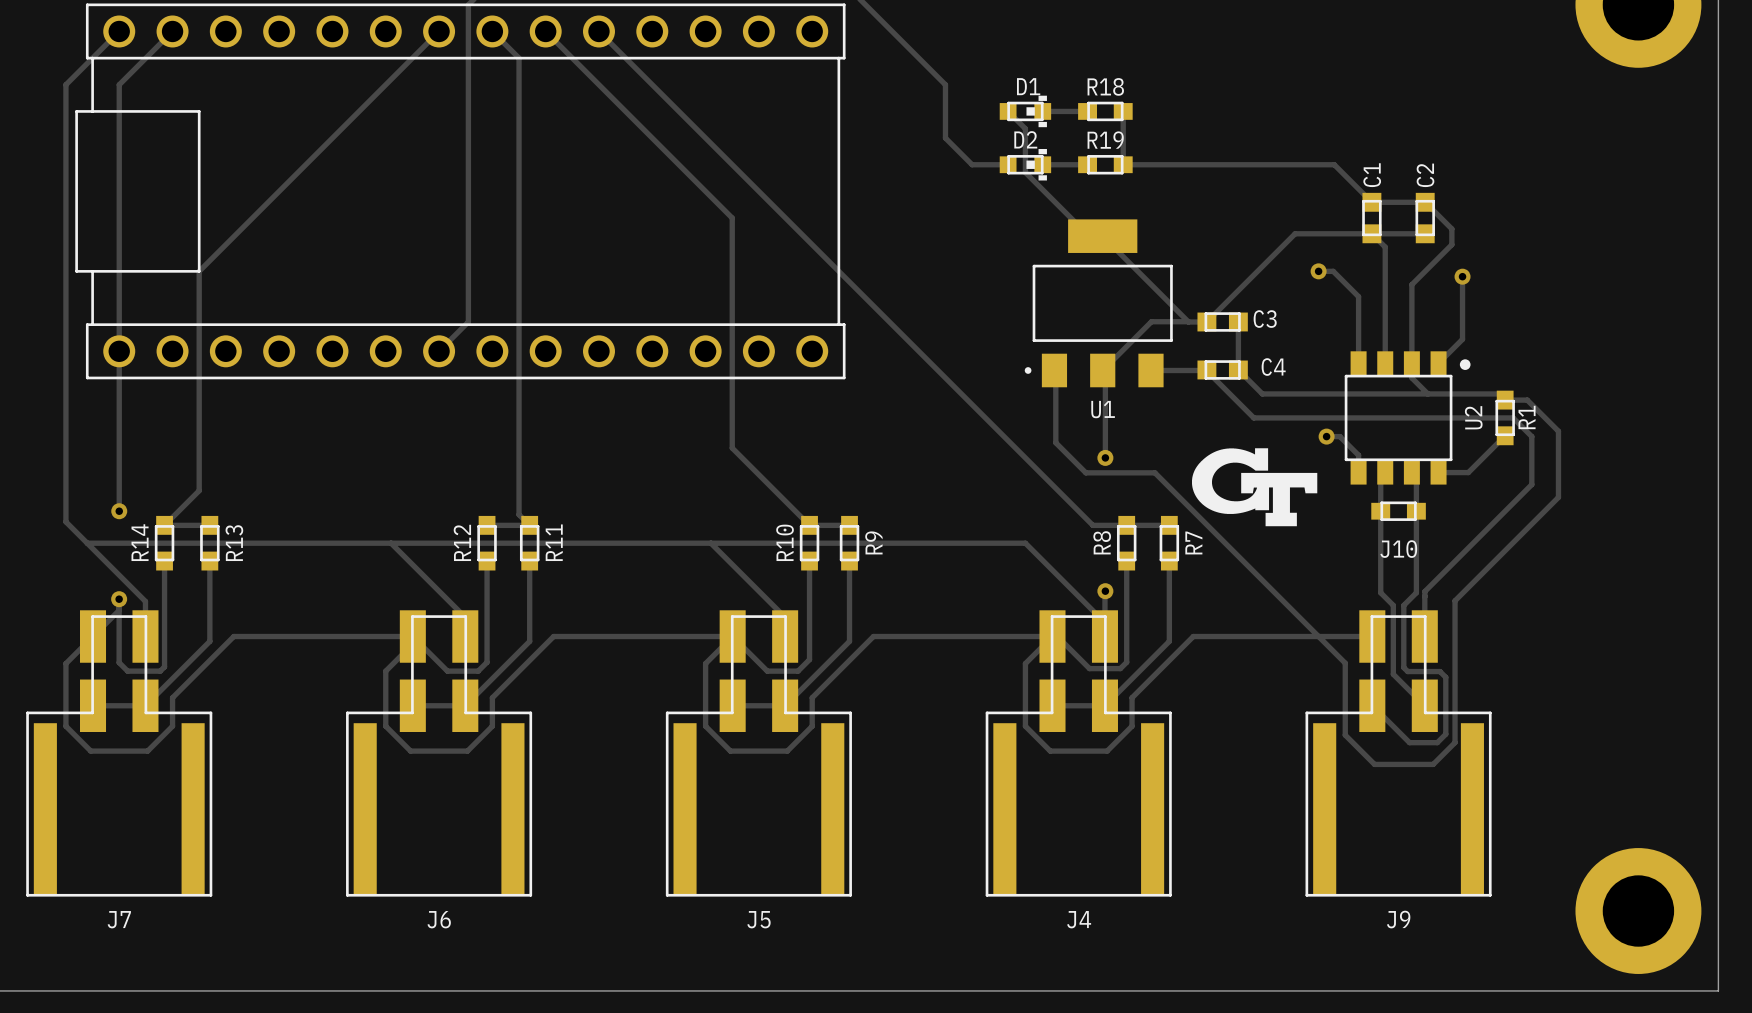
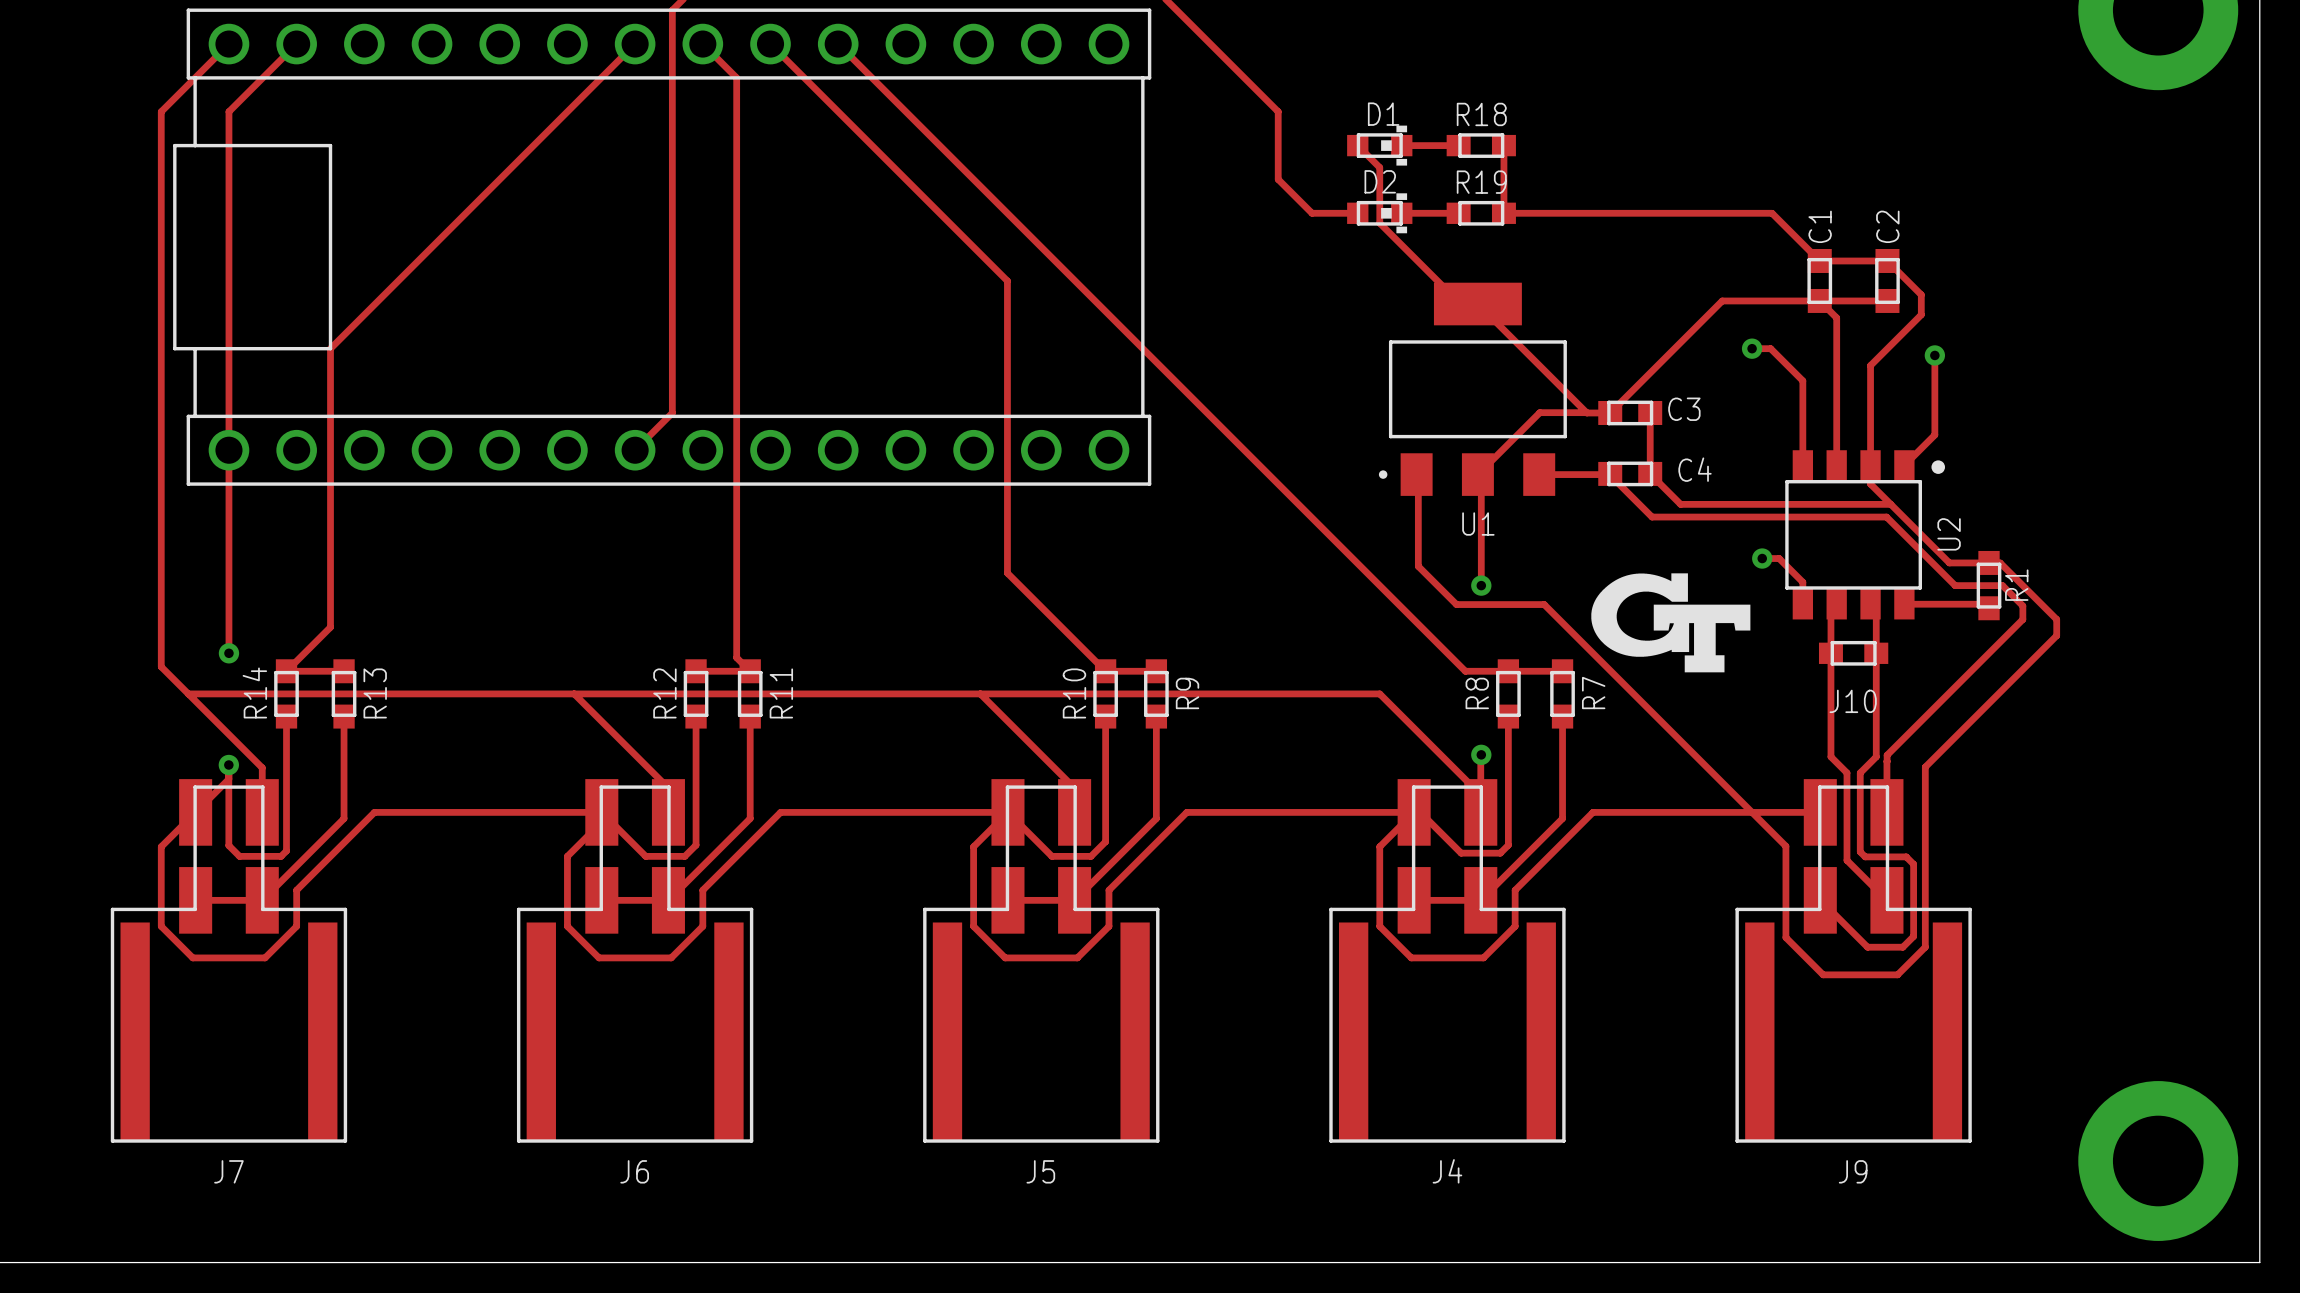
track: (1427, 393) (1499, 393) (1505, 400) (1527, 400) (1558, 431) (1558, 484) -> (1890, 504) (1949, 562) (2000, 562) (2056, 619)
track: (1239, 403) (1253, 417) (1513, 417) (1531, 436) (1531, 473) -> (1652, 517) (1886, 517) (1955, 585) (2002, 585) (2022, 605)
R1 position: (1505, 417) -> (1989, 585)
track: (1505, 435) (1468, 472) -> (1989, 608) (1984, 604) (1942, 604)

